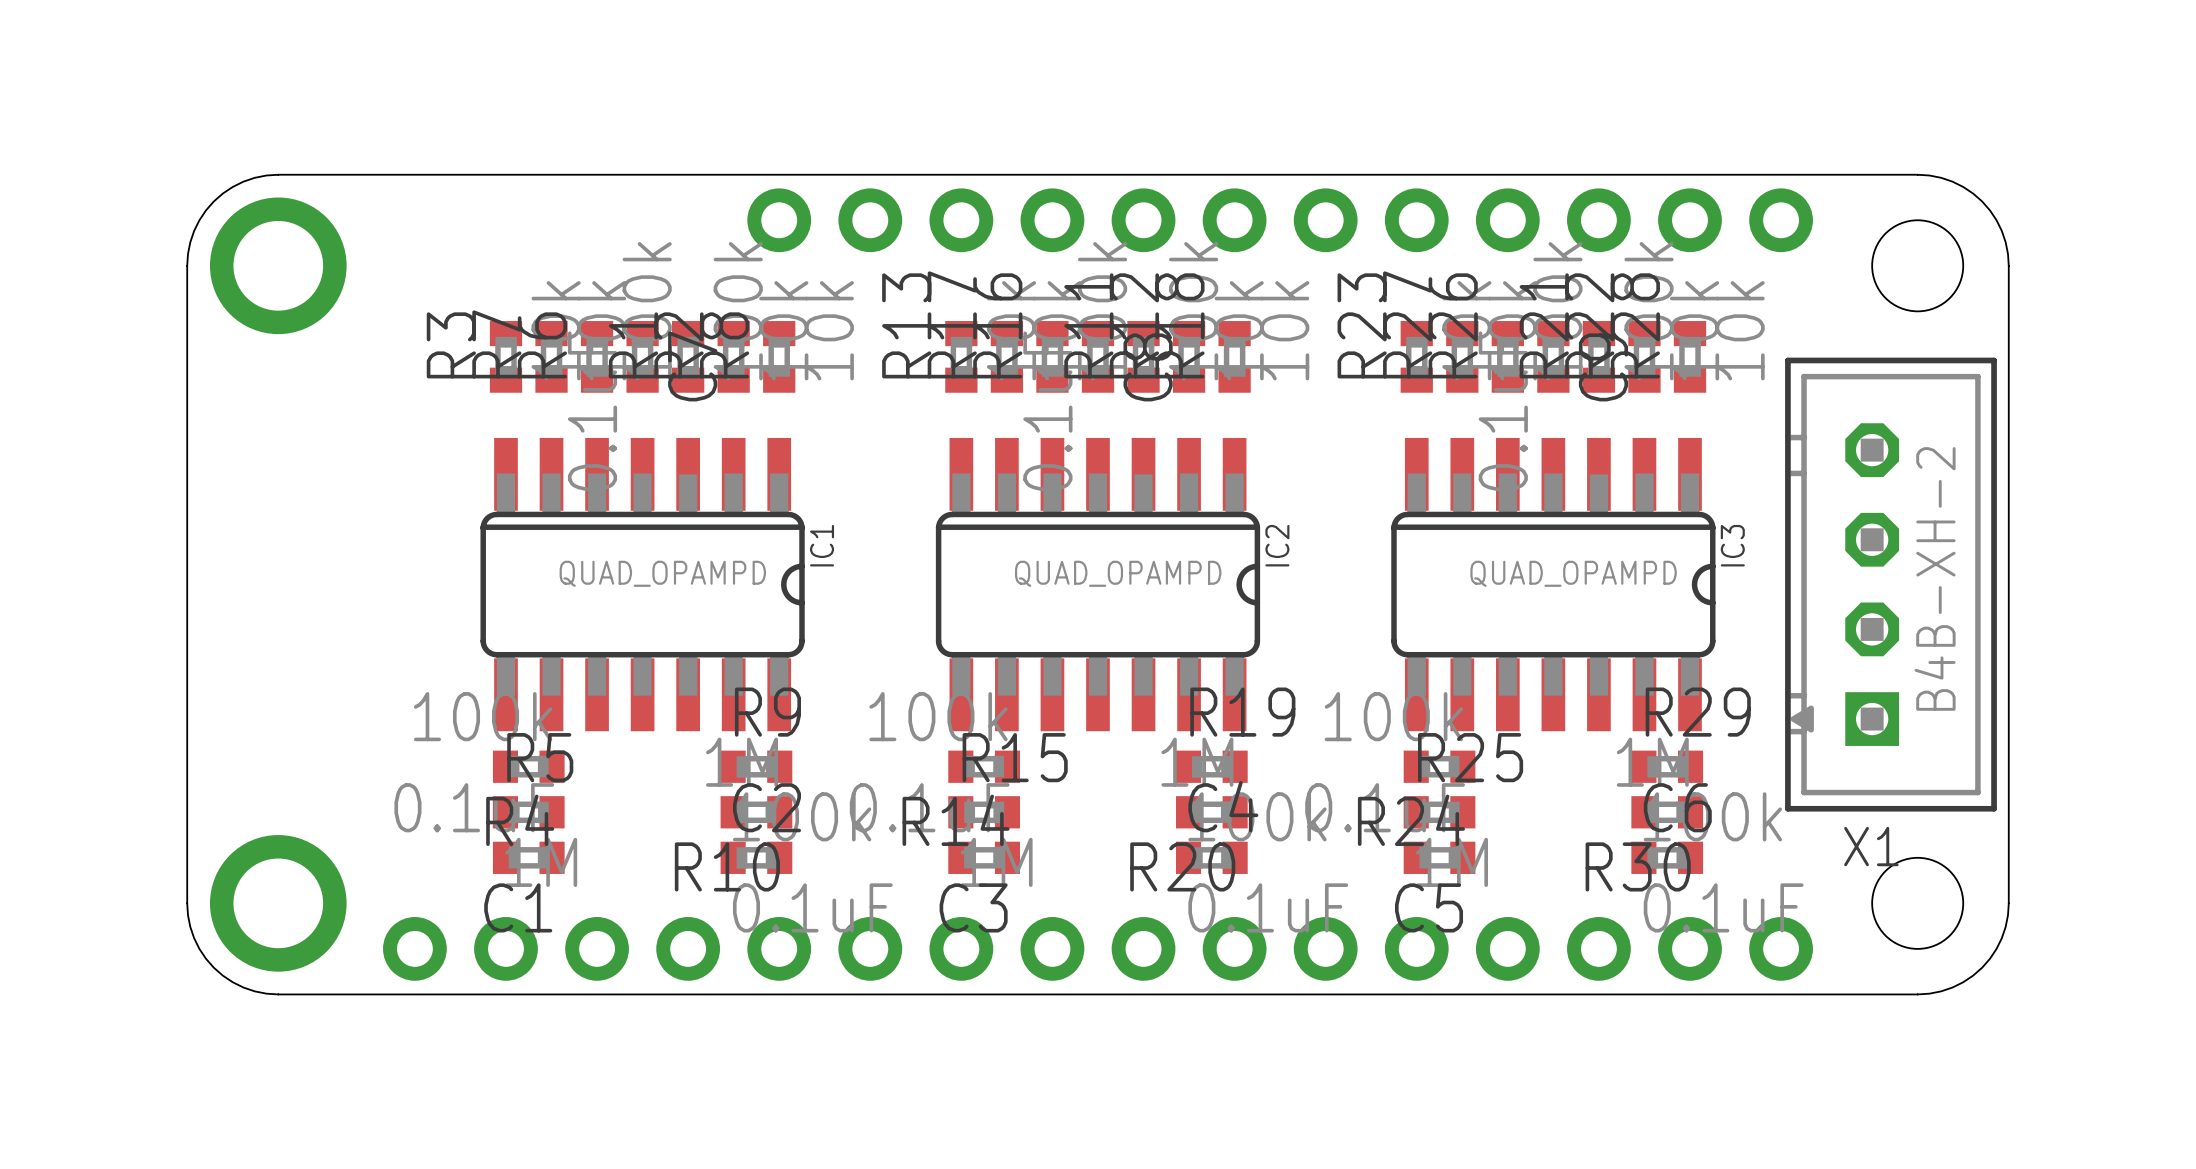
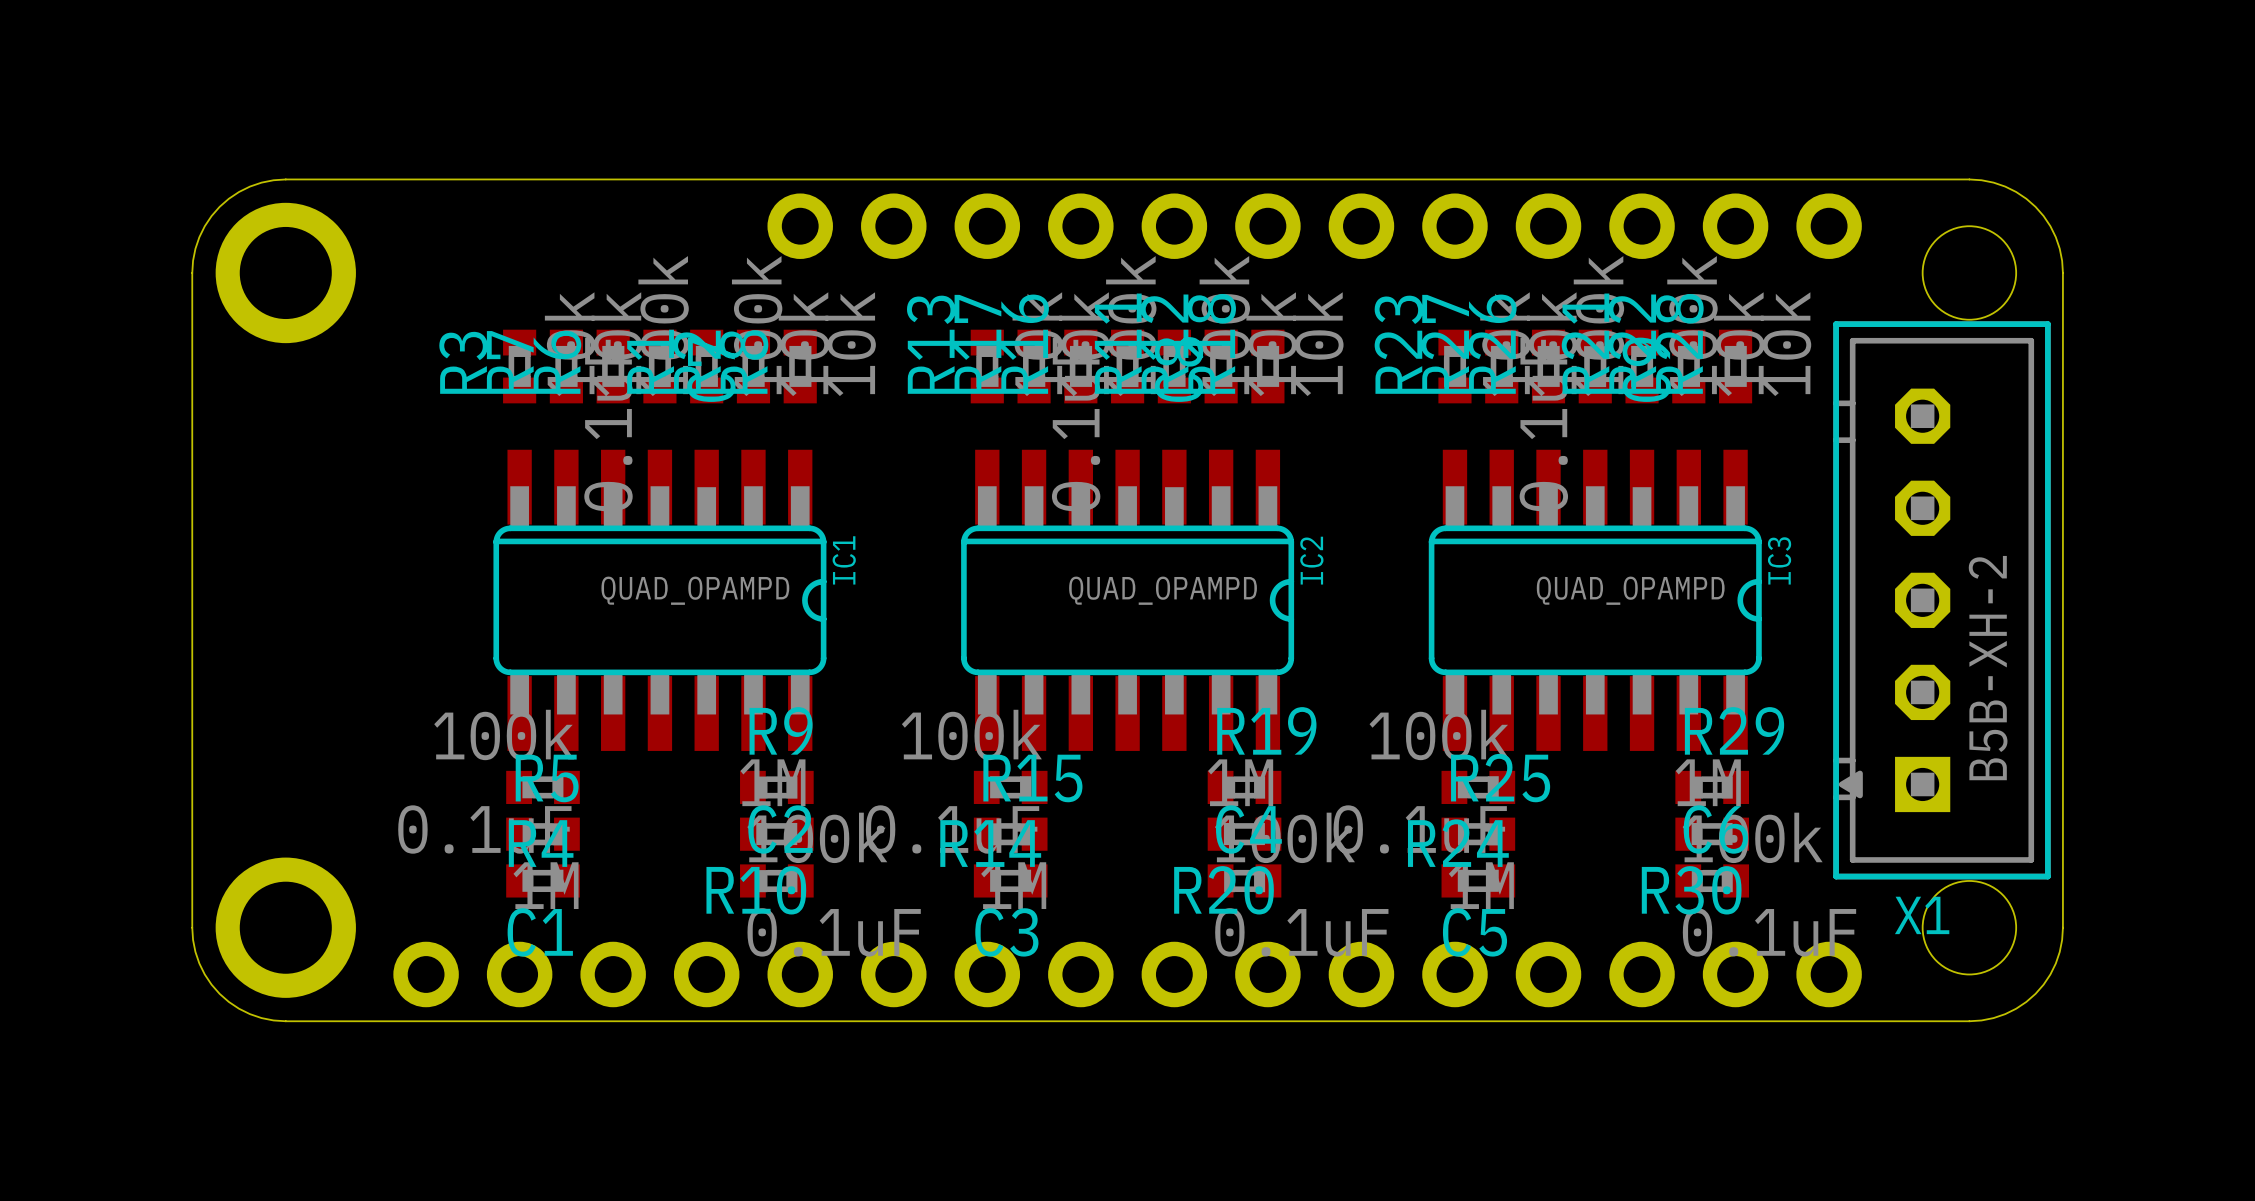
X1 footprint: [1785, 357, 1997, 812] -> [1833, 321, 2051, 880]
X1 value: B4B-XH-2 (1935, 578) -> B5B-XH-2 (1988, 668)

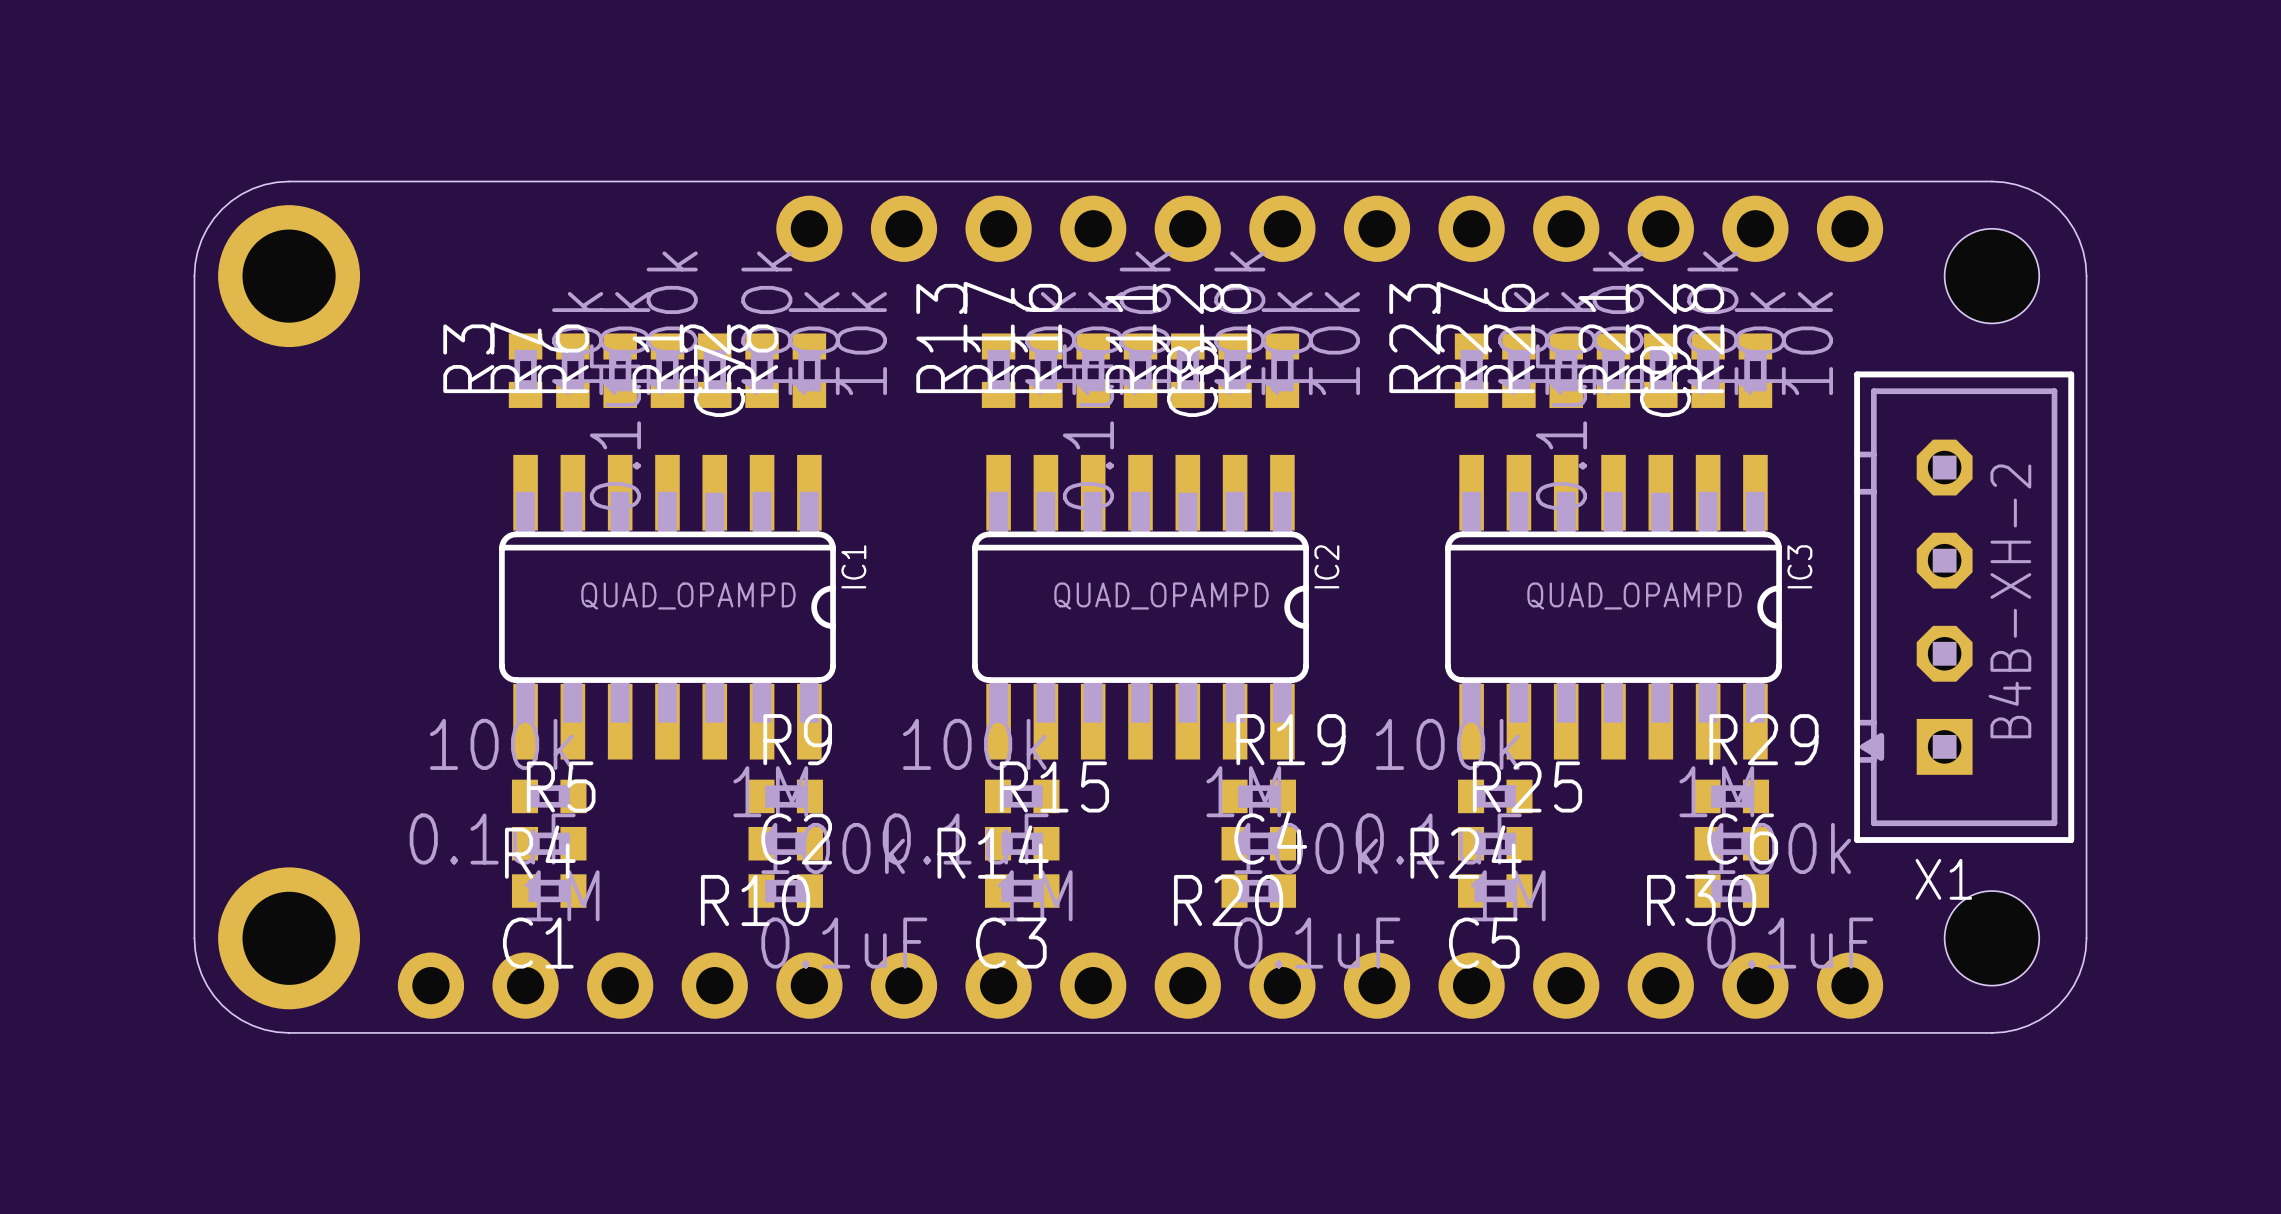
X1 footprint: [1833, 321, 2051, 880] -> [1854, 371, 2075, 843]
X1 value: B5B-XH-2 (1988, 668) -> B4B-XH-2 (2009, 601)

